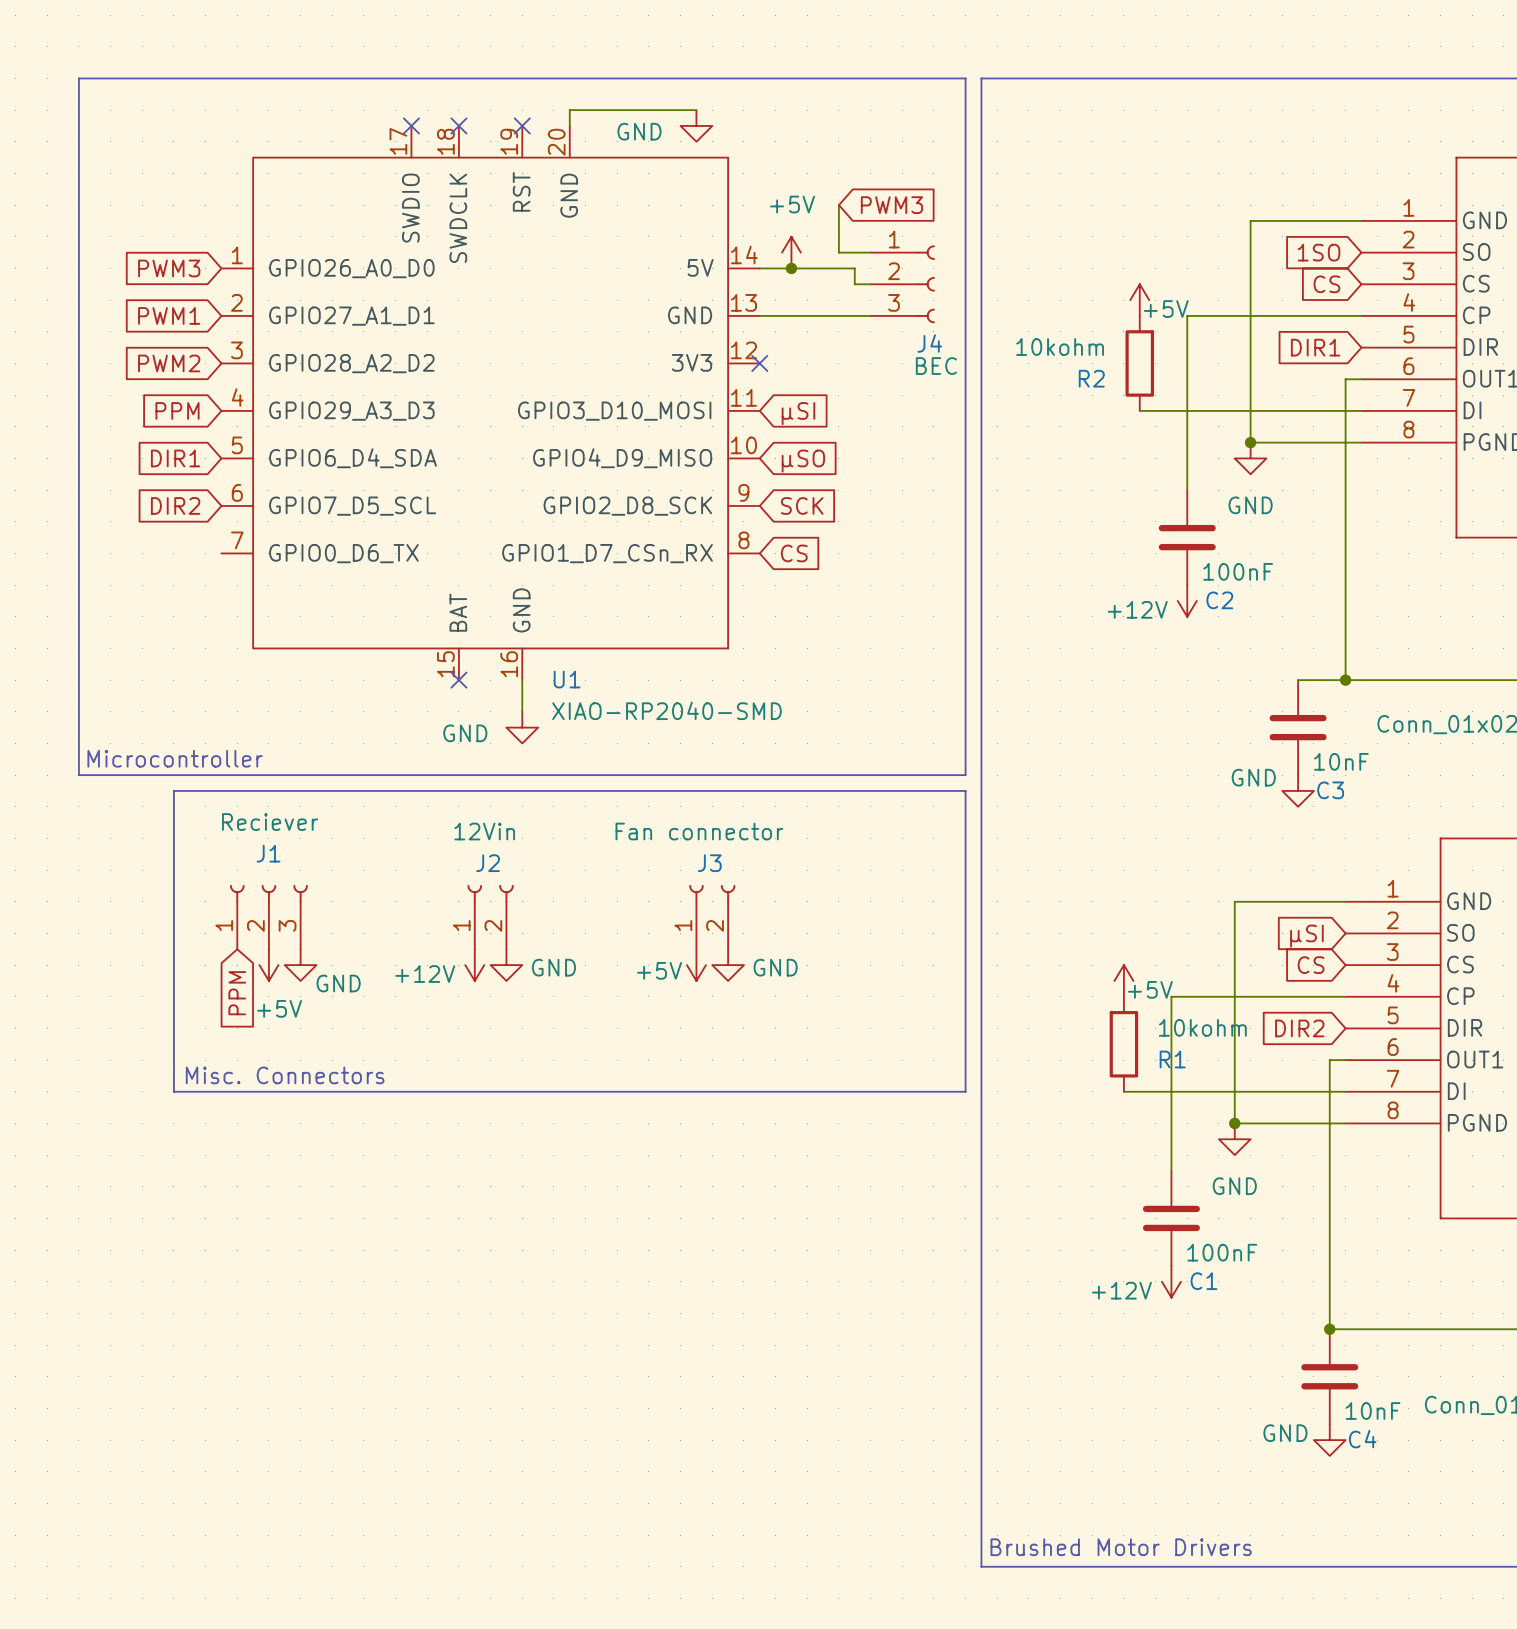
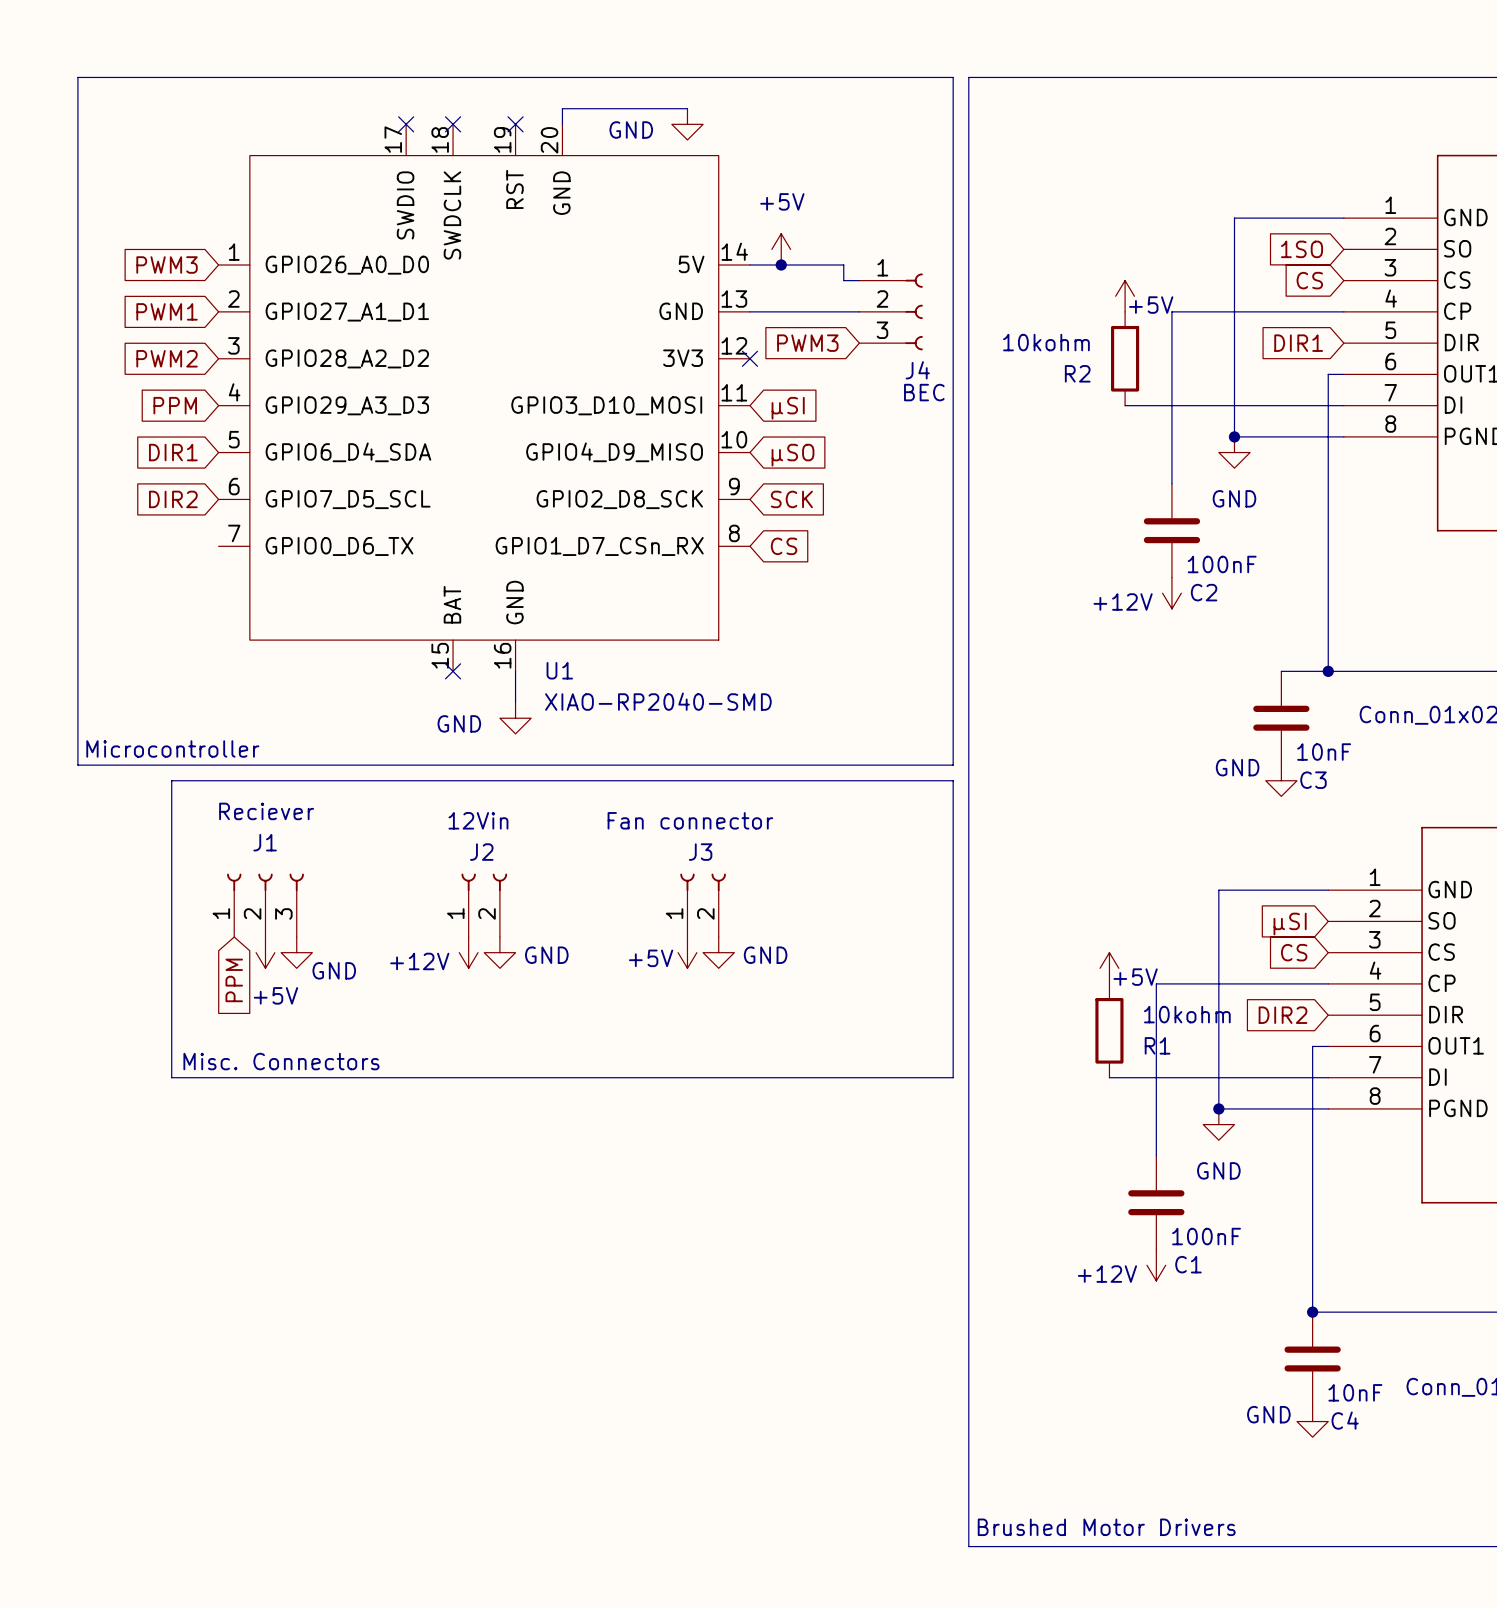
wire: (838, 205) (838, 252) (870, 252) -> none
global label rotation: 0° (891, 205) -> 180° (807, 343)
global label position: PWM3 (891, 205) -> PWM3 (807, 343)
J4 position: (902, 284) -> (891, 311)

